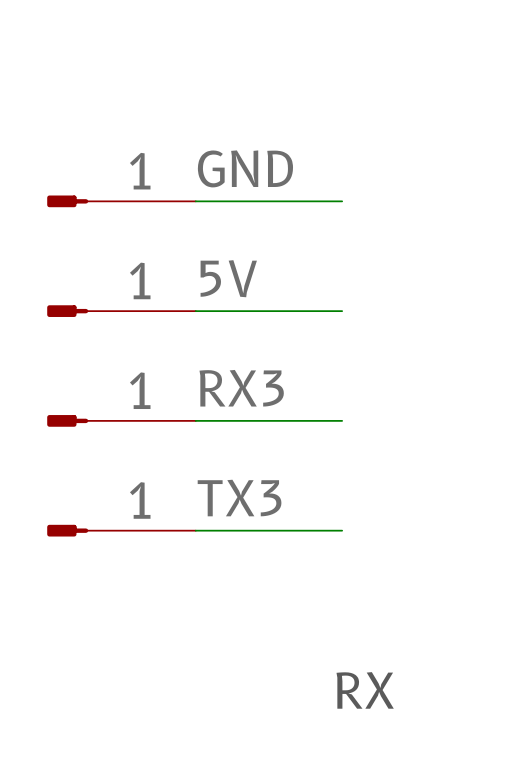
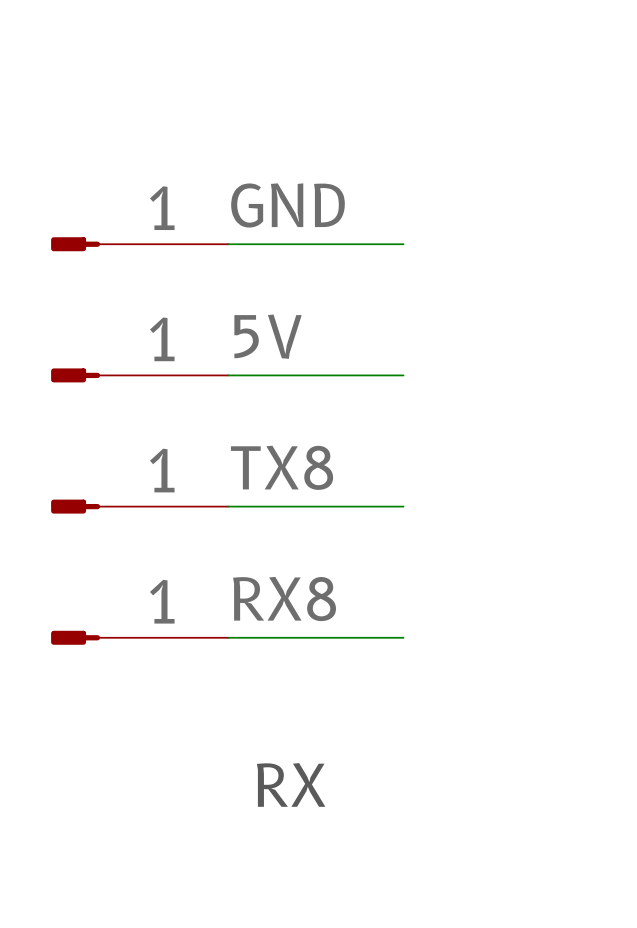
label: RX3 (241, 388) -> TX8 (282, 467)
label: TX3 (239, 498) -> RX8 (284, 599)
text position: RX (365, 690) -> RX (291, 784)

